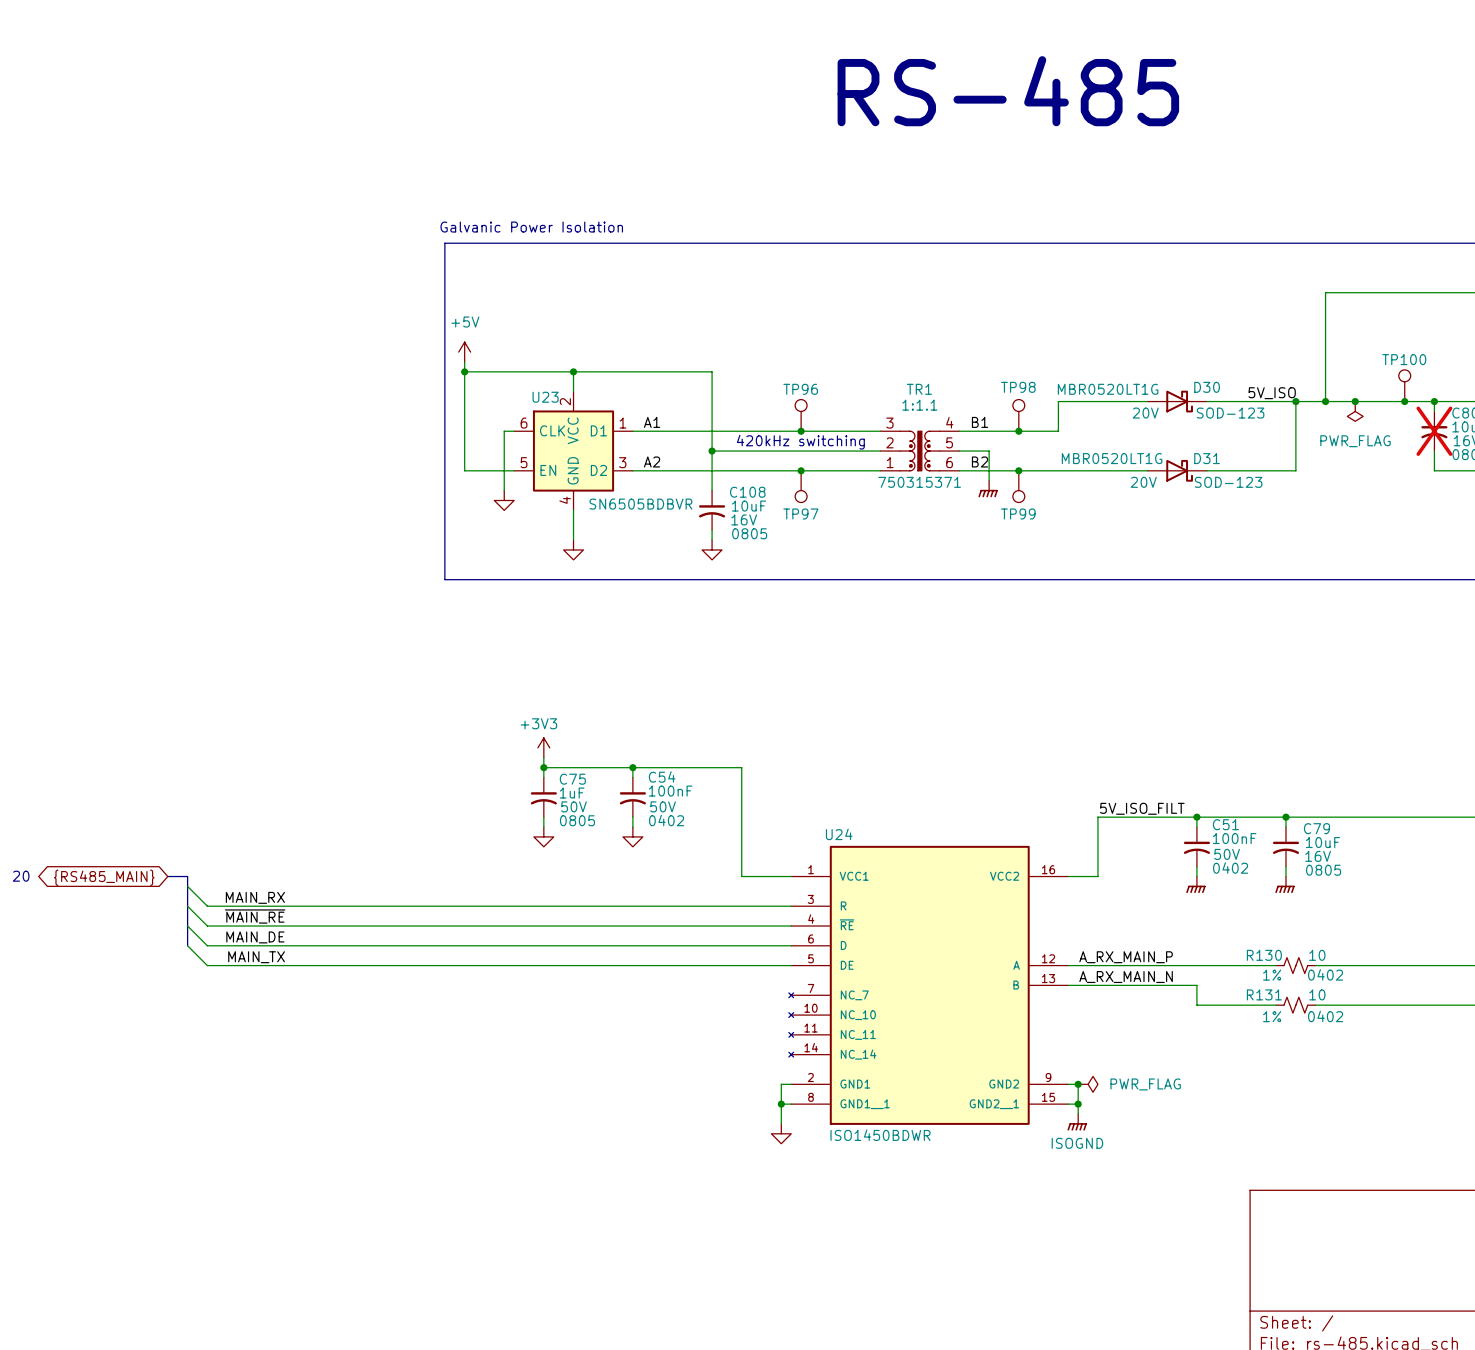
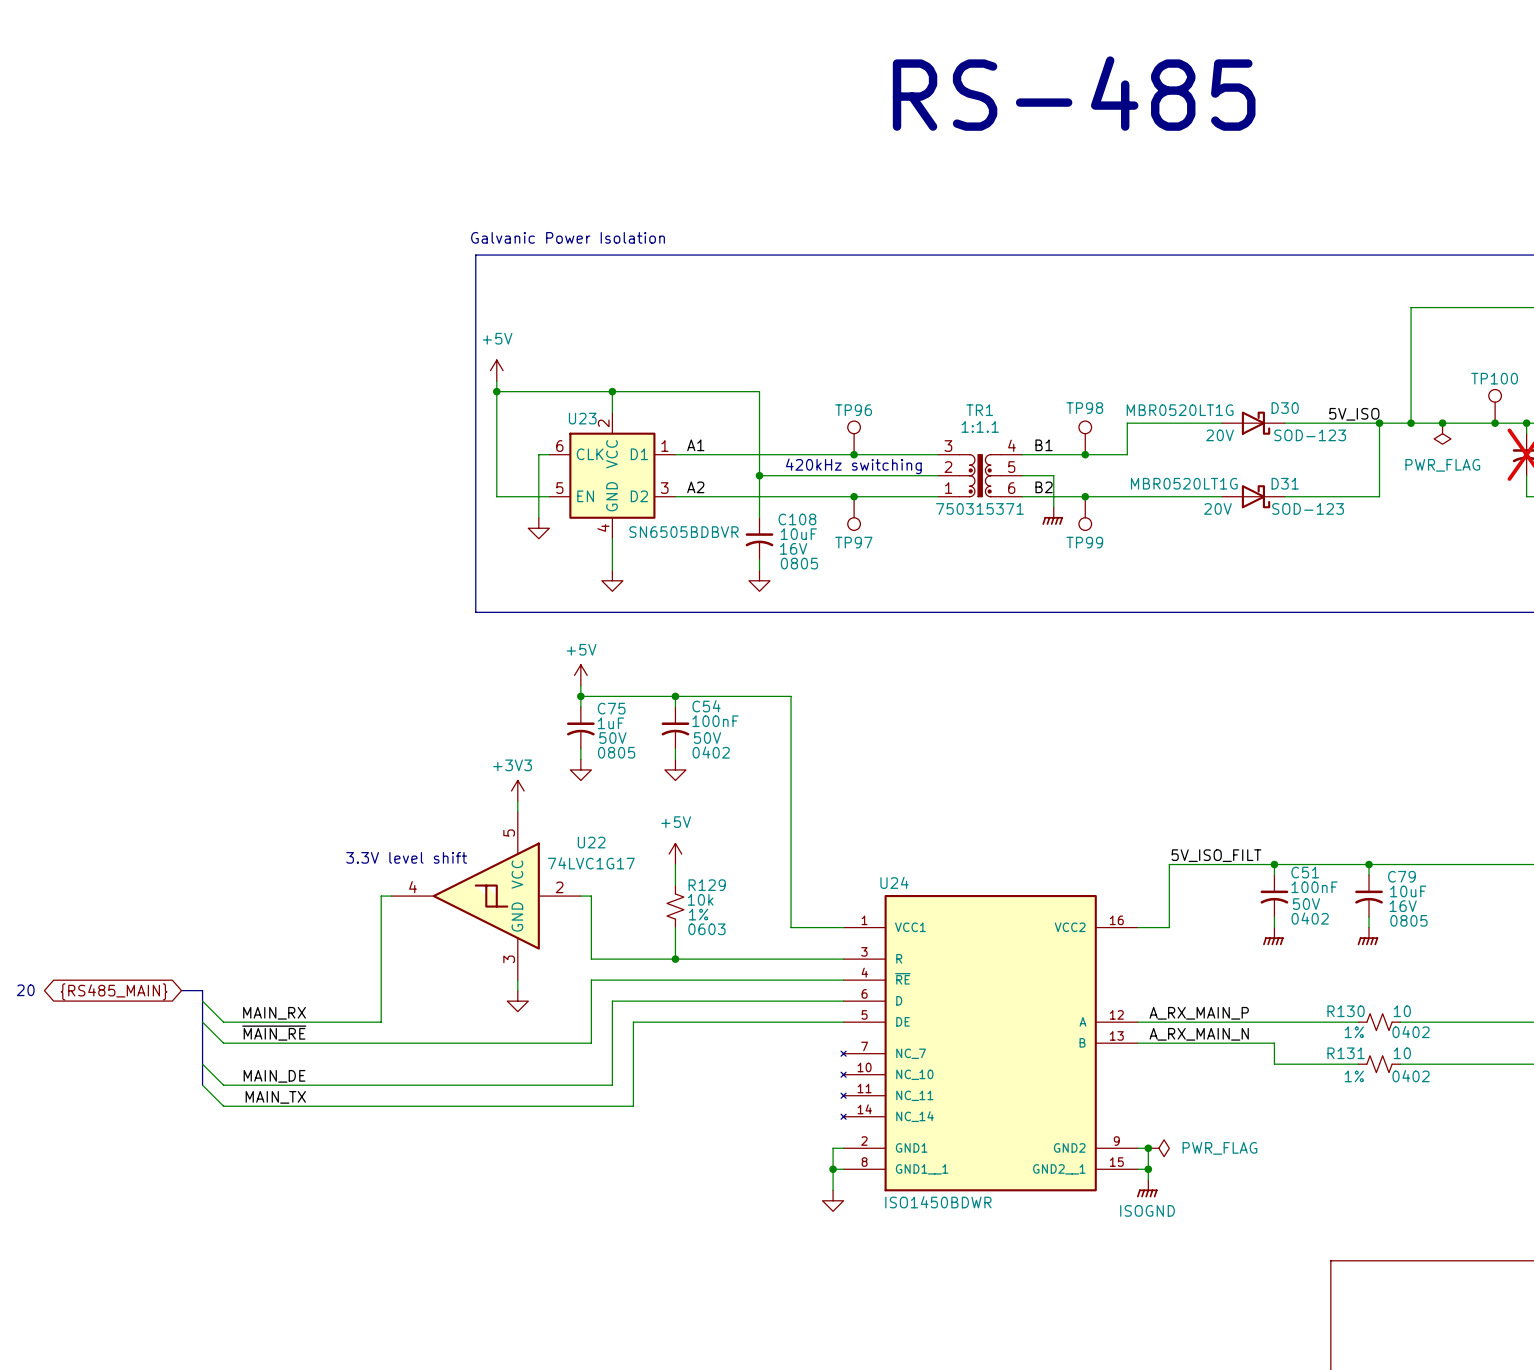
power symbol: none -> +5V (580, 675)
junction: none -> (580, 696)
junction: none -> (675, 696)
wire: none -> (675, 748) (675, 759)
power symbol: none -> (580, 769)
power symbol: none -> (675, 769)
power symbol position: +3V3 (543, 747) -> +3V3 (517, 790)
wire: none -> (517, 801) (517, 811)
wire: (543, 757) (543, 777) -> (580, 685) (580, 706)
wire: (543, 767) (741, 767) -> (580, 696) (791, 696) (791, 811)
junction: (543, 767) -> none
wire: (632, 767) (632, 777) -> (675, 696) (675, 706)
junction: (632, 767) -> none
C75 position: (543, 797) -> (580, 727)
C54 position: (632, 797) -> (675, 727)
power symbol: none -> +5V (675, 854)
text: none -> 3.3V level shift (406, 857)
wire: (543, 817) (543, 827) -> (580, 748) (580, 759)
power symbol: (543, 836) -> none
power symbol: (632, 836) -> none
wire: none -> (391, 896) (381, 896) (381, 1022)
U22: none -> 74LVC1G17 (486, 896)
R129: none -> 10k (675, 906)
text position: 20 (21, 876) -> 20 (25, 990)
bus: (167, 876) (187, 876) (187, 935) -> (181, 990) (202, 990)
wire: none -> (675, 927) (675, 959)
global label position: {RS485_MAIN} (104, 877) -> {RS485_MAIN} (114, 991)
wire: (187, 886) (207, 906) (553, 906) -> (580, 896) (591, 896) (591, 959)
label: MAIN_RX (255, 897) -> none
wire: (187, 906) (207, 926) (553, 926) -> (202, 1022) (223, 1043) (591, 1043) (591, 980)
junction: none -> (675, 959)
label position: ~{MAIN_RE} (255, 916) -> ~{MAIN_RE} (274, 1033)
wire: (187, 926) (207, 945) (573, 945) -> (202, 1064) (223, 1085) (612, 1085) (612, 1001)
wire: none -> (517, 980) (517, 990)
label position: MAIN_DE (255, 937) -> MAIN_DE (274, 1076)
bus: none -> (202, 1001) (202, 1085)
power symbol: none -> (517, 1001)
label: MAIN_TX (256, 957) -> MAIN_RX (274, 1013)
wire: (355, 965) (593, 965) -> (202, 1085) (223, 1106) (633, 1106) (633, 1022)
label: none -> MAIN_TX (275, 1097)

